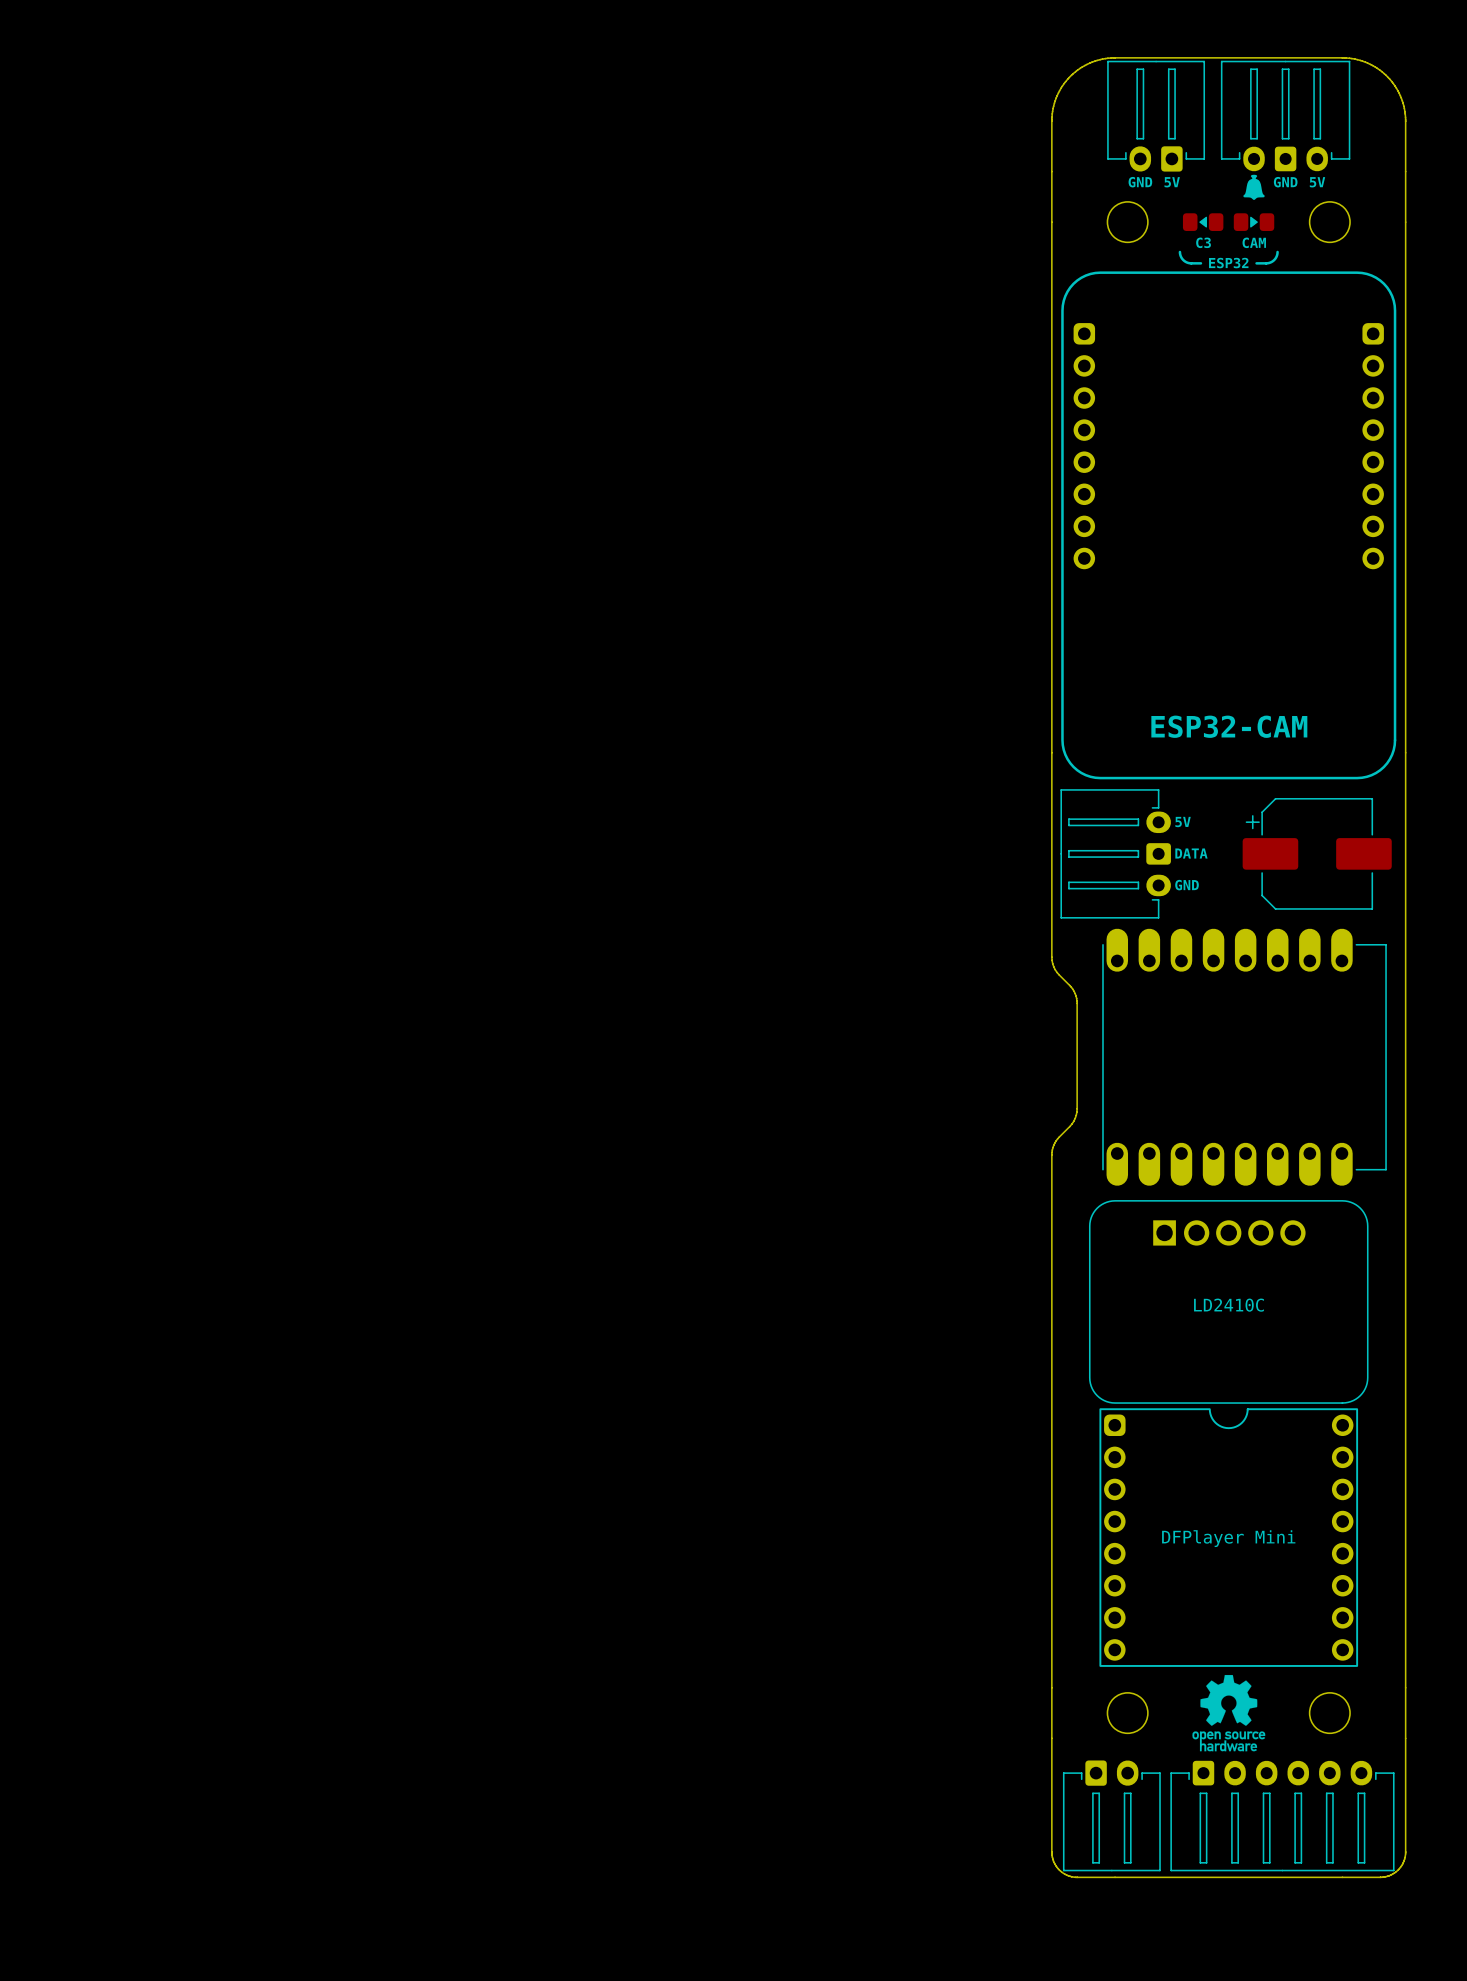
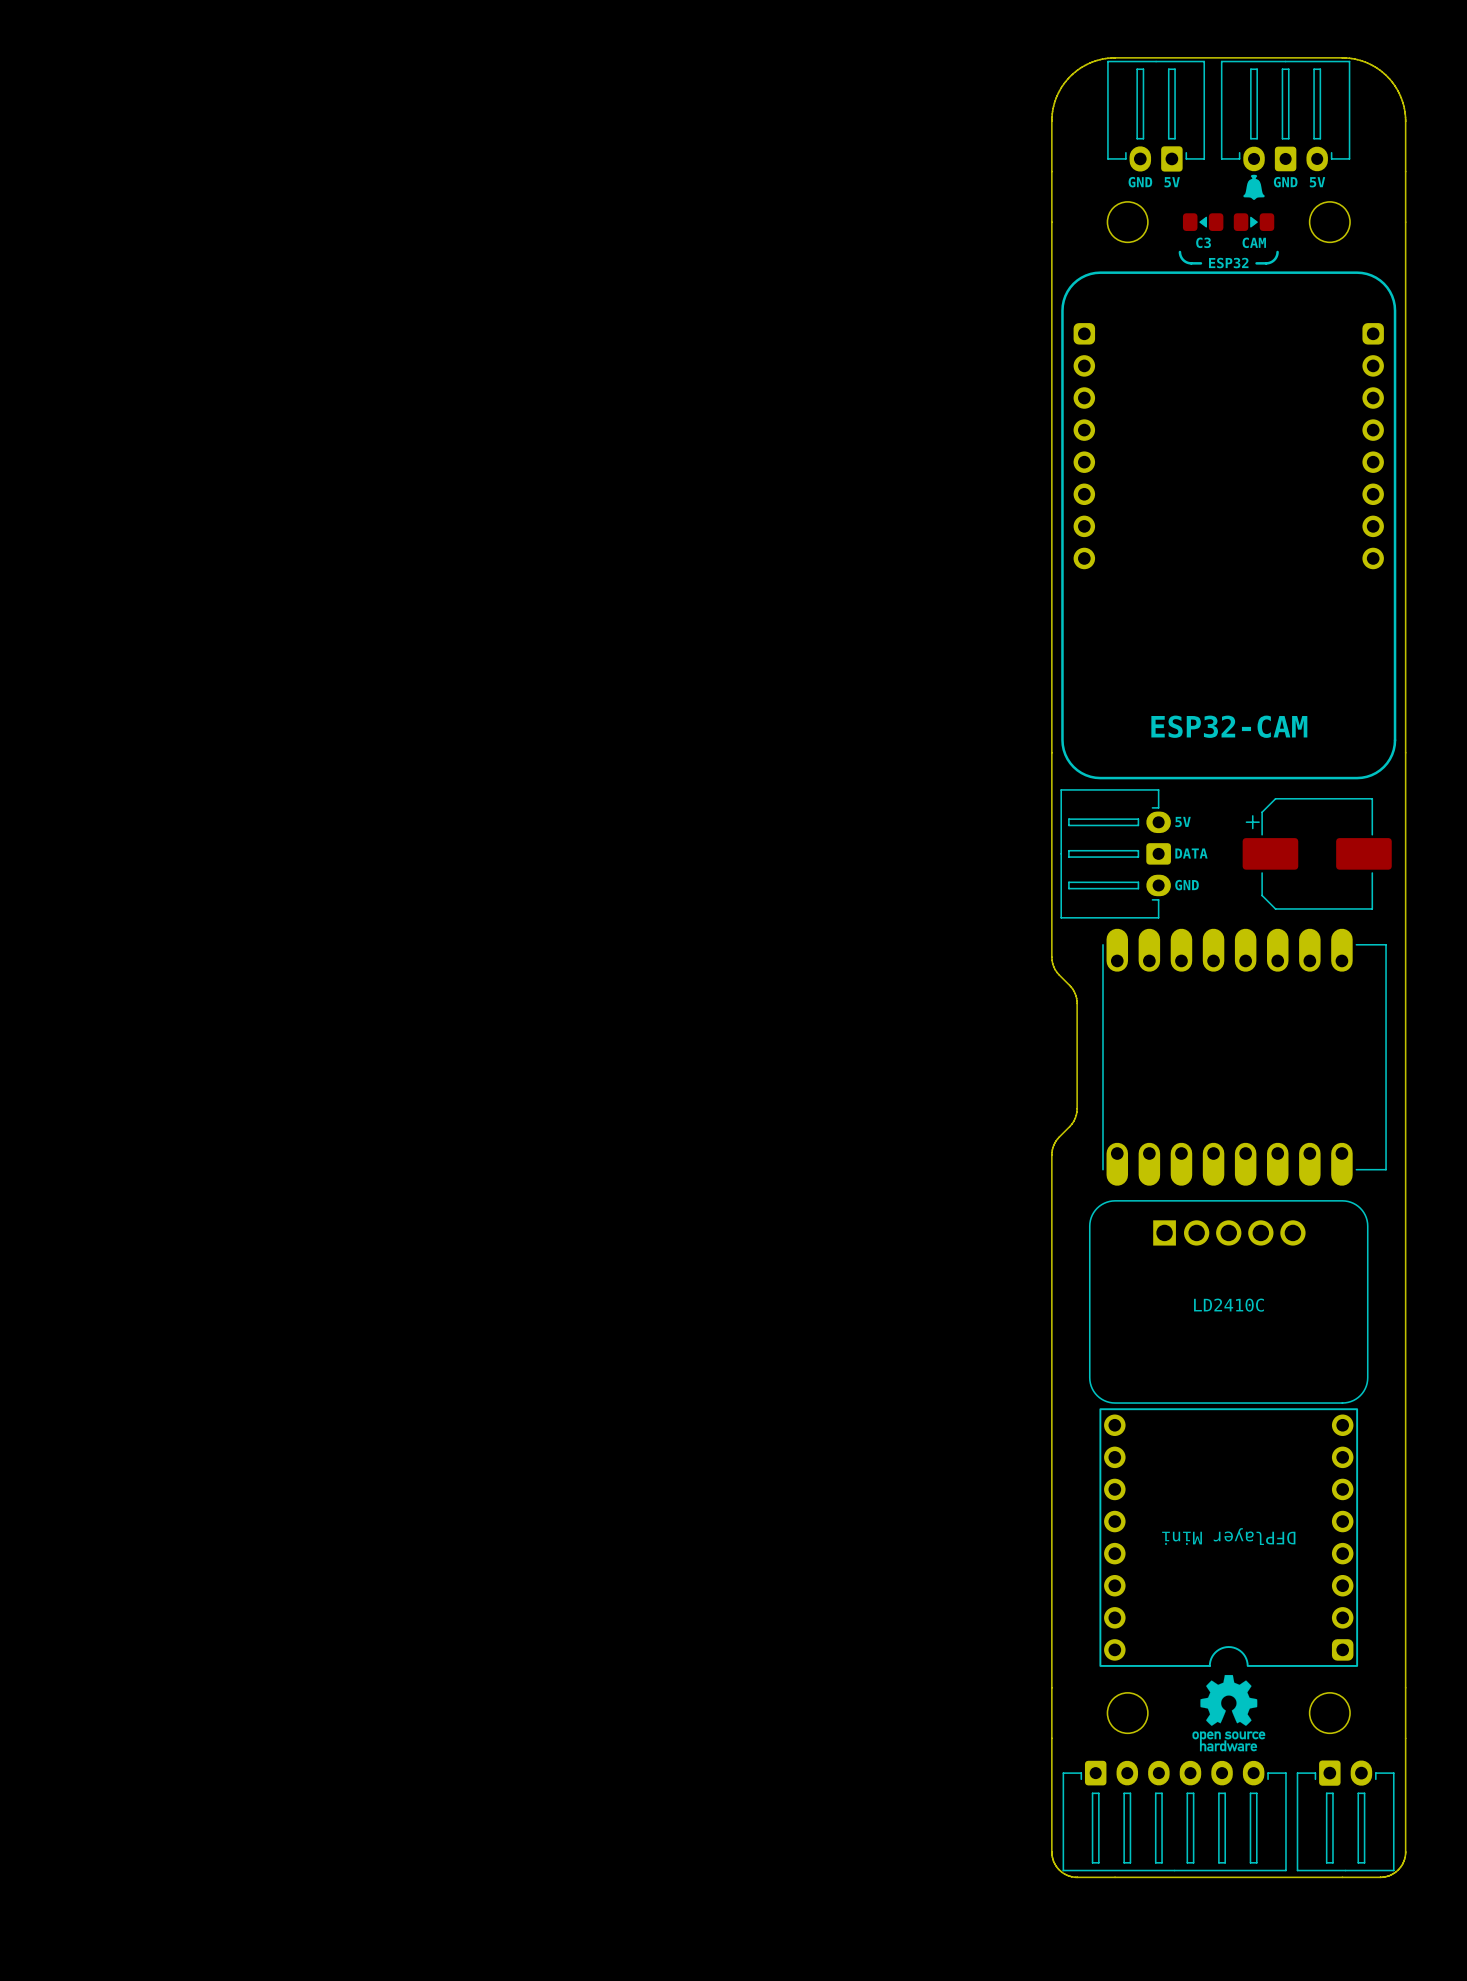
part rotation: 0° (1228, 1537) -> 180° (1228, 1537)
part position: (1111, 1815) -> (1345, 1815)
part position: (1282, 1816) -> (1174, 1816)

